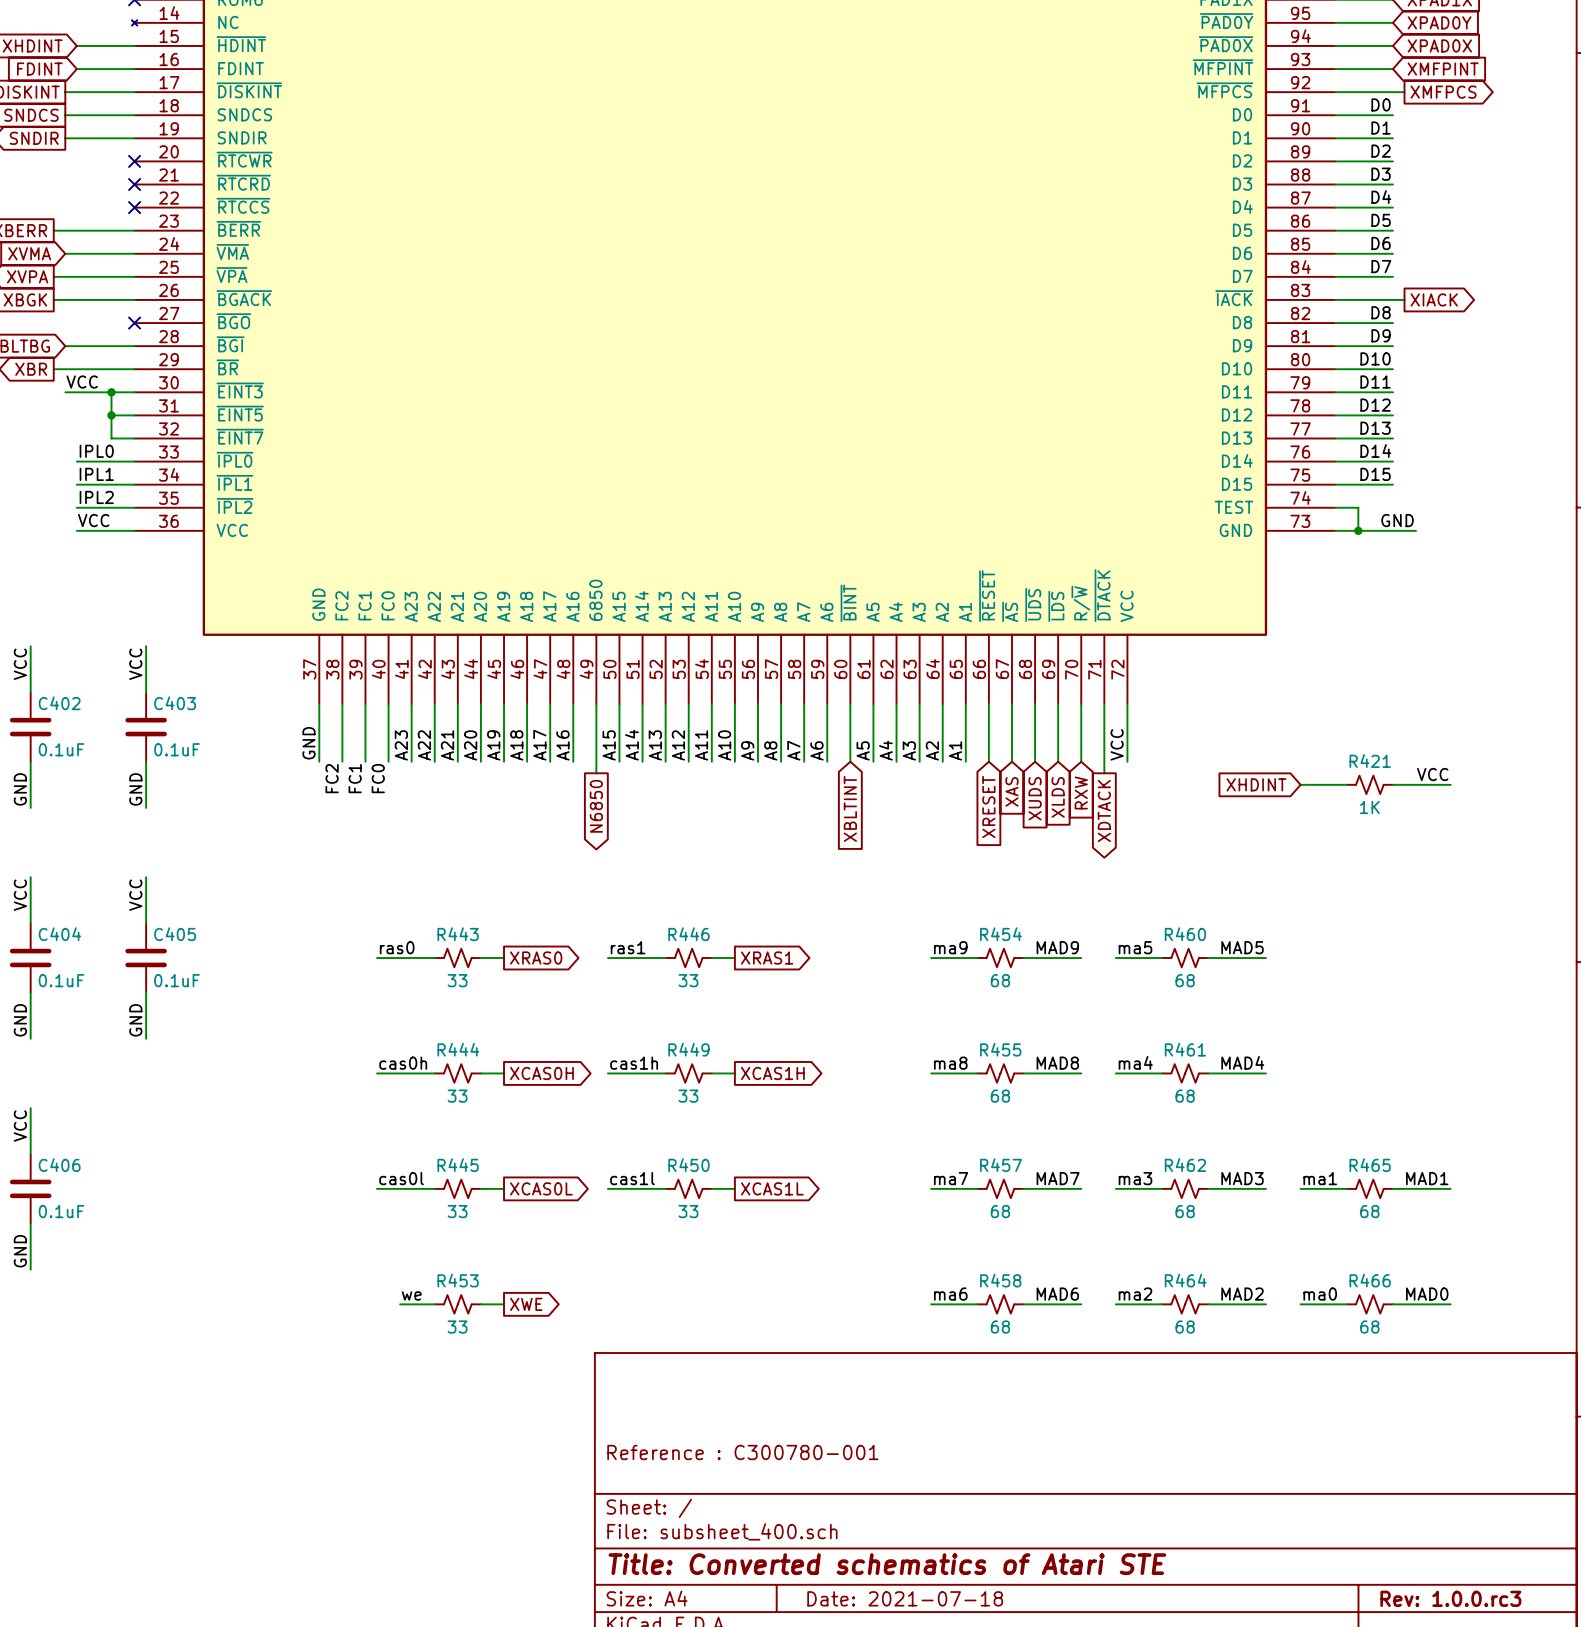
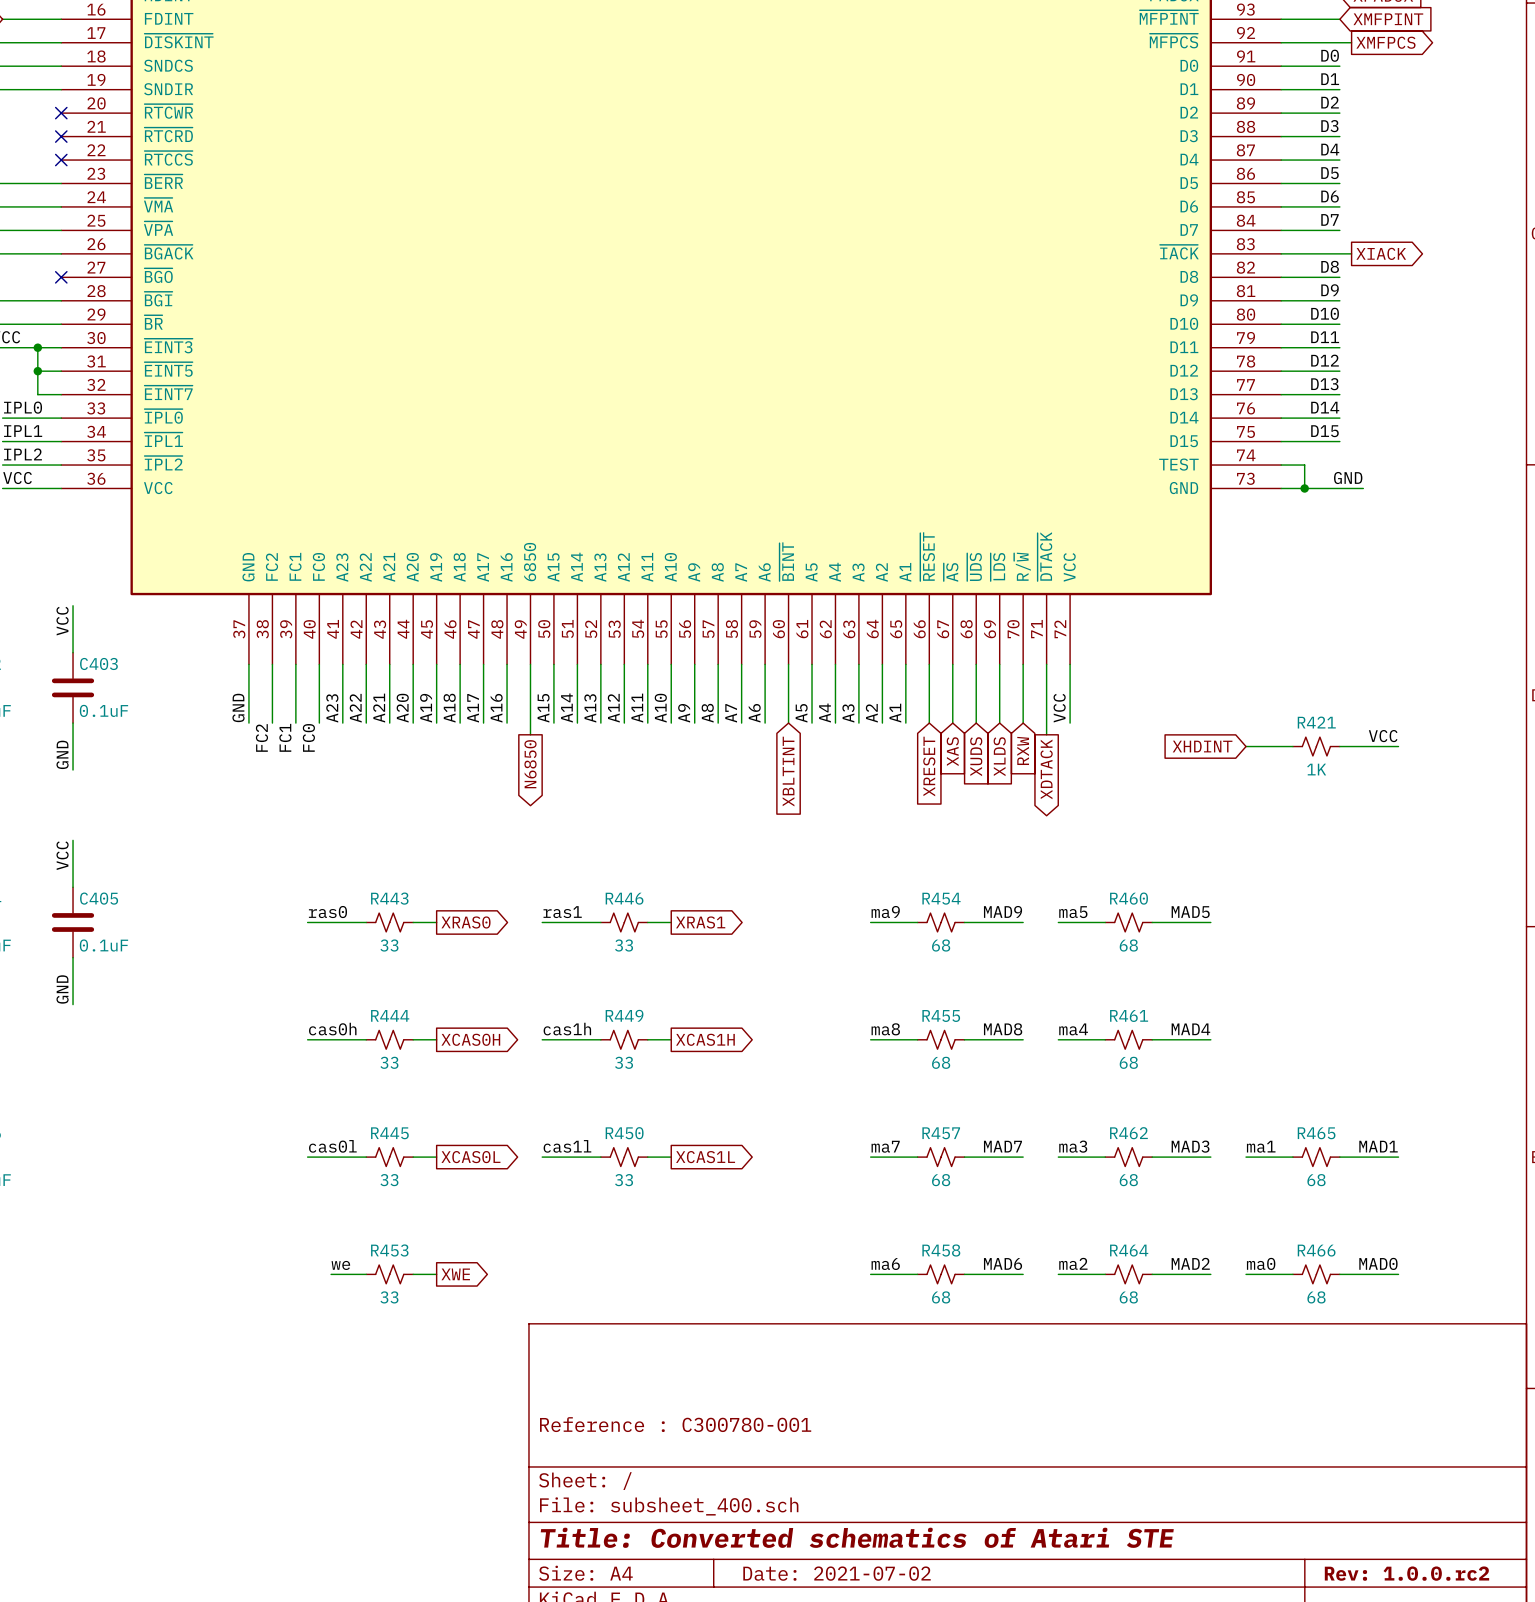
title block: Date: 2021-07-18 (905, 1598) -> Date: 2021-07-02 (837, 1573)
title block: Rev: 1.0.0.rc3 (1450, 1598) -> Rev: 1.0.0.rc2 (1406, 1573)

